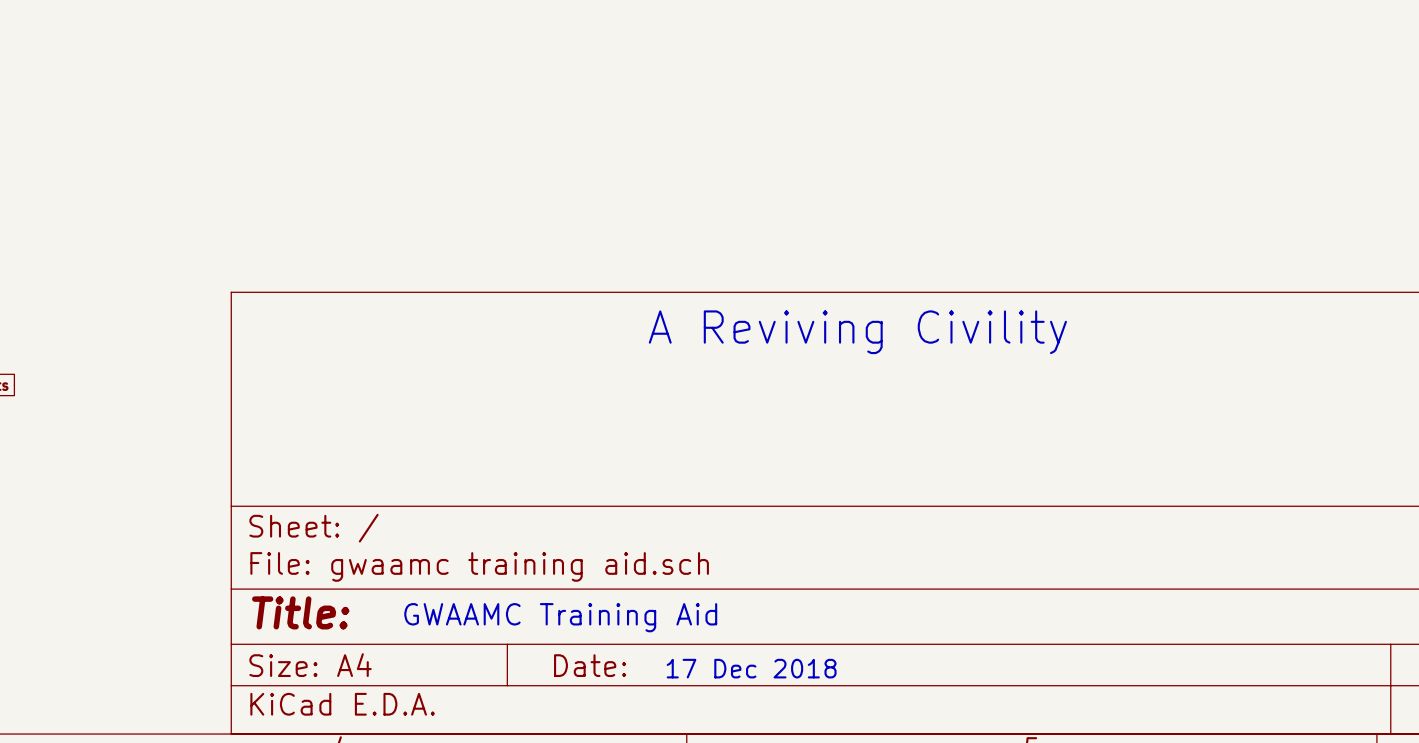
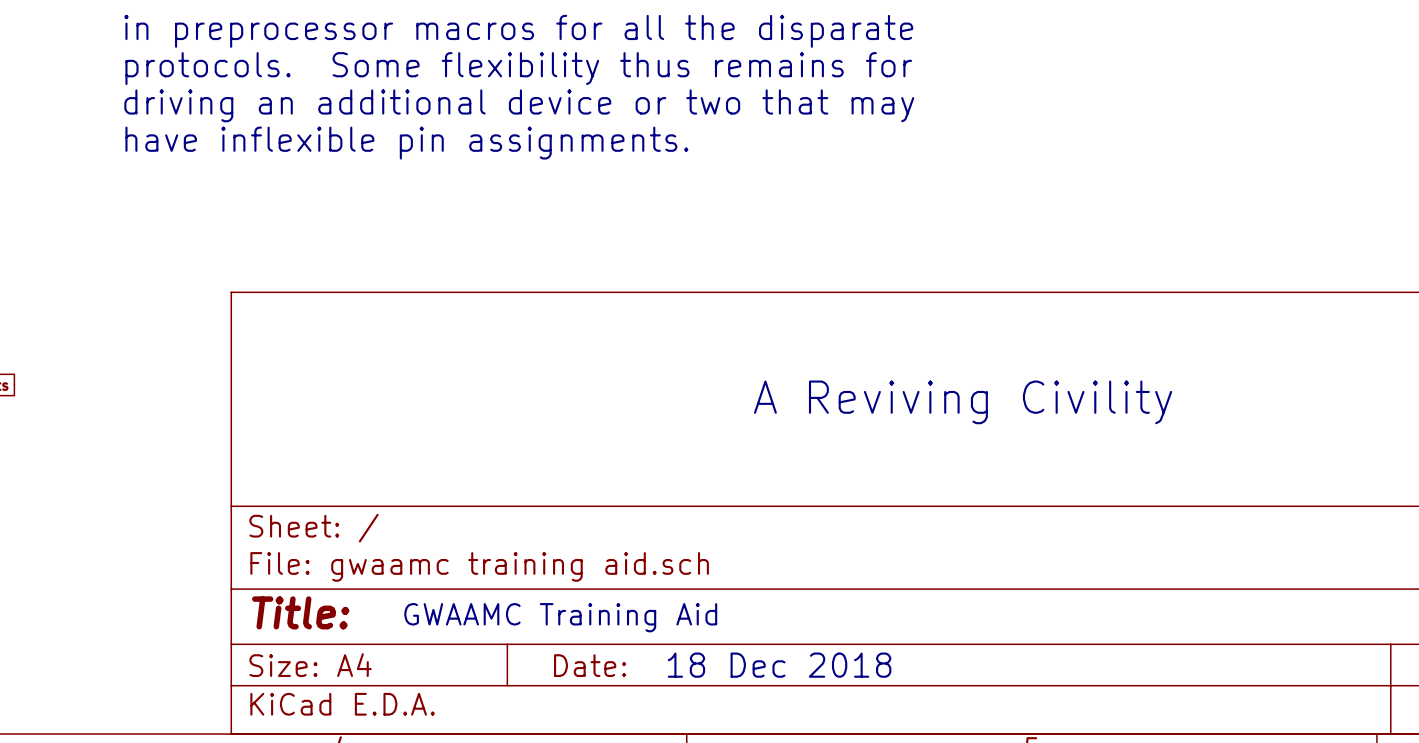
text: none -> in preprocessor macros for all the disparate (518, 31)
text: none -> protocols. Some flexibility thus remains for (518, 68)
text: none -> driving an additional device or two that may (519, 105)
text: none -> have inflexible pin assignments. (406, 143)
text position: A Reviving Civility (857, 332) -> A Reviving Civility (963, 402)
text: 17 Dec 2018 (751, 668) -> 18 Dec 2018 (779, 665)

